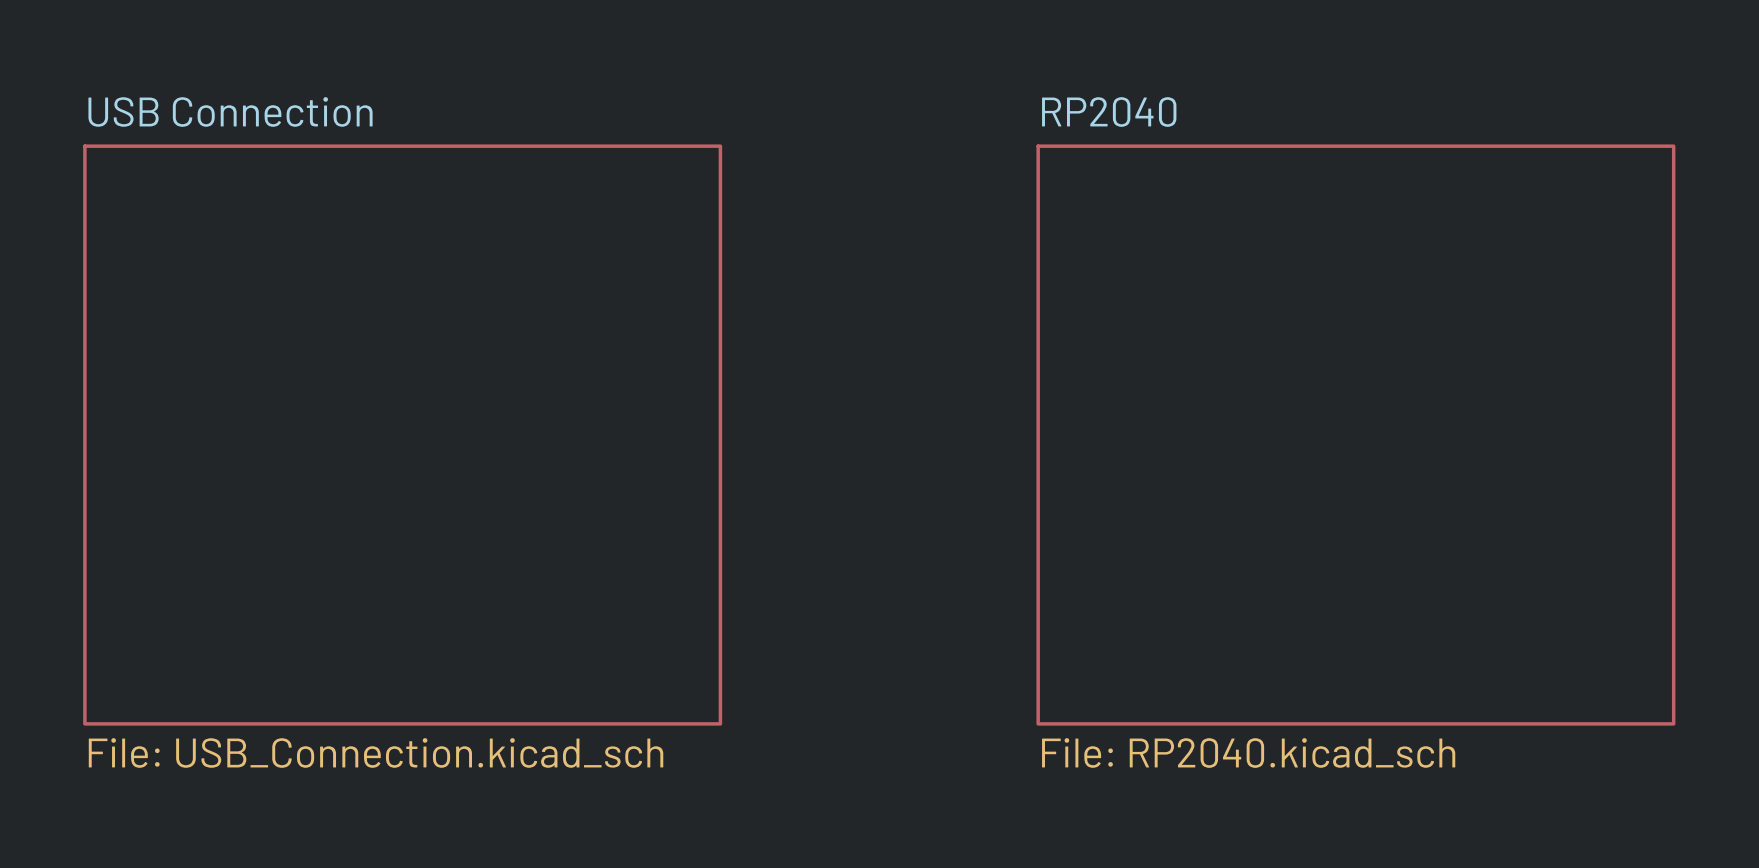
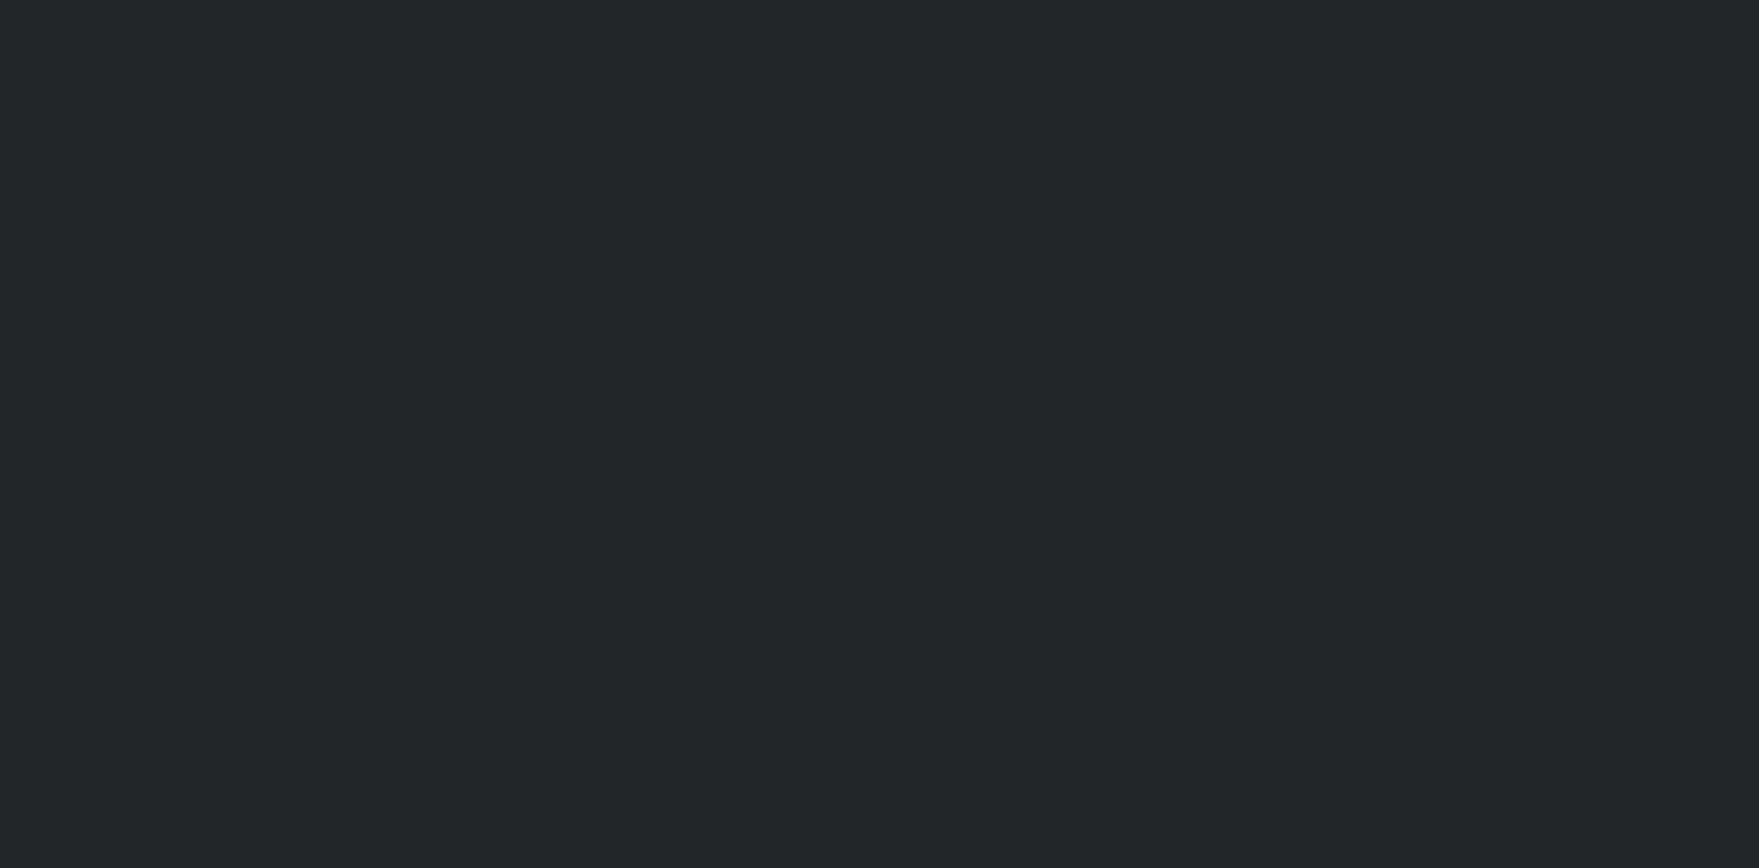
sheet USB Connection: File: USB_Connection.kicad_sch (402, 435) -> none
sheet RP2040: File: RP2040.kicad_sch (1355, 435) -> none

